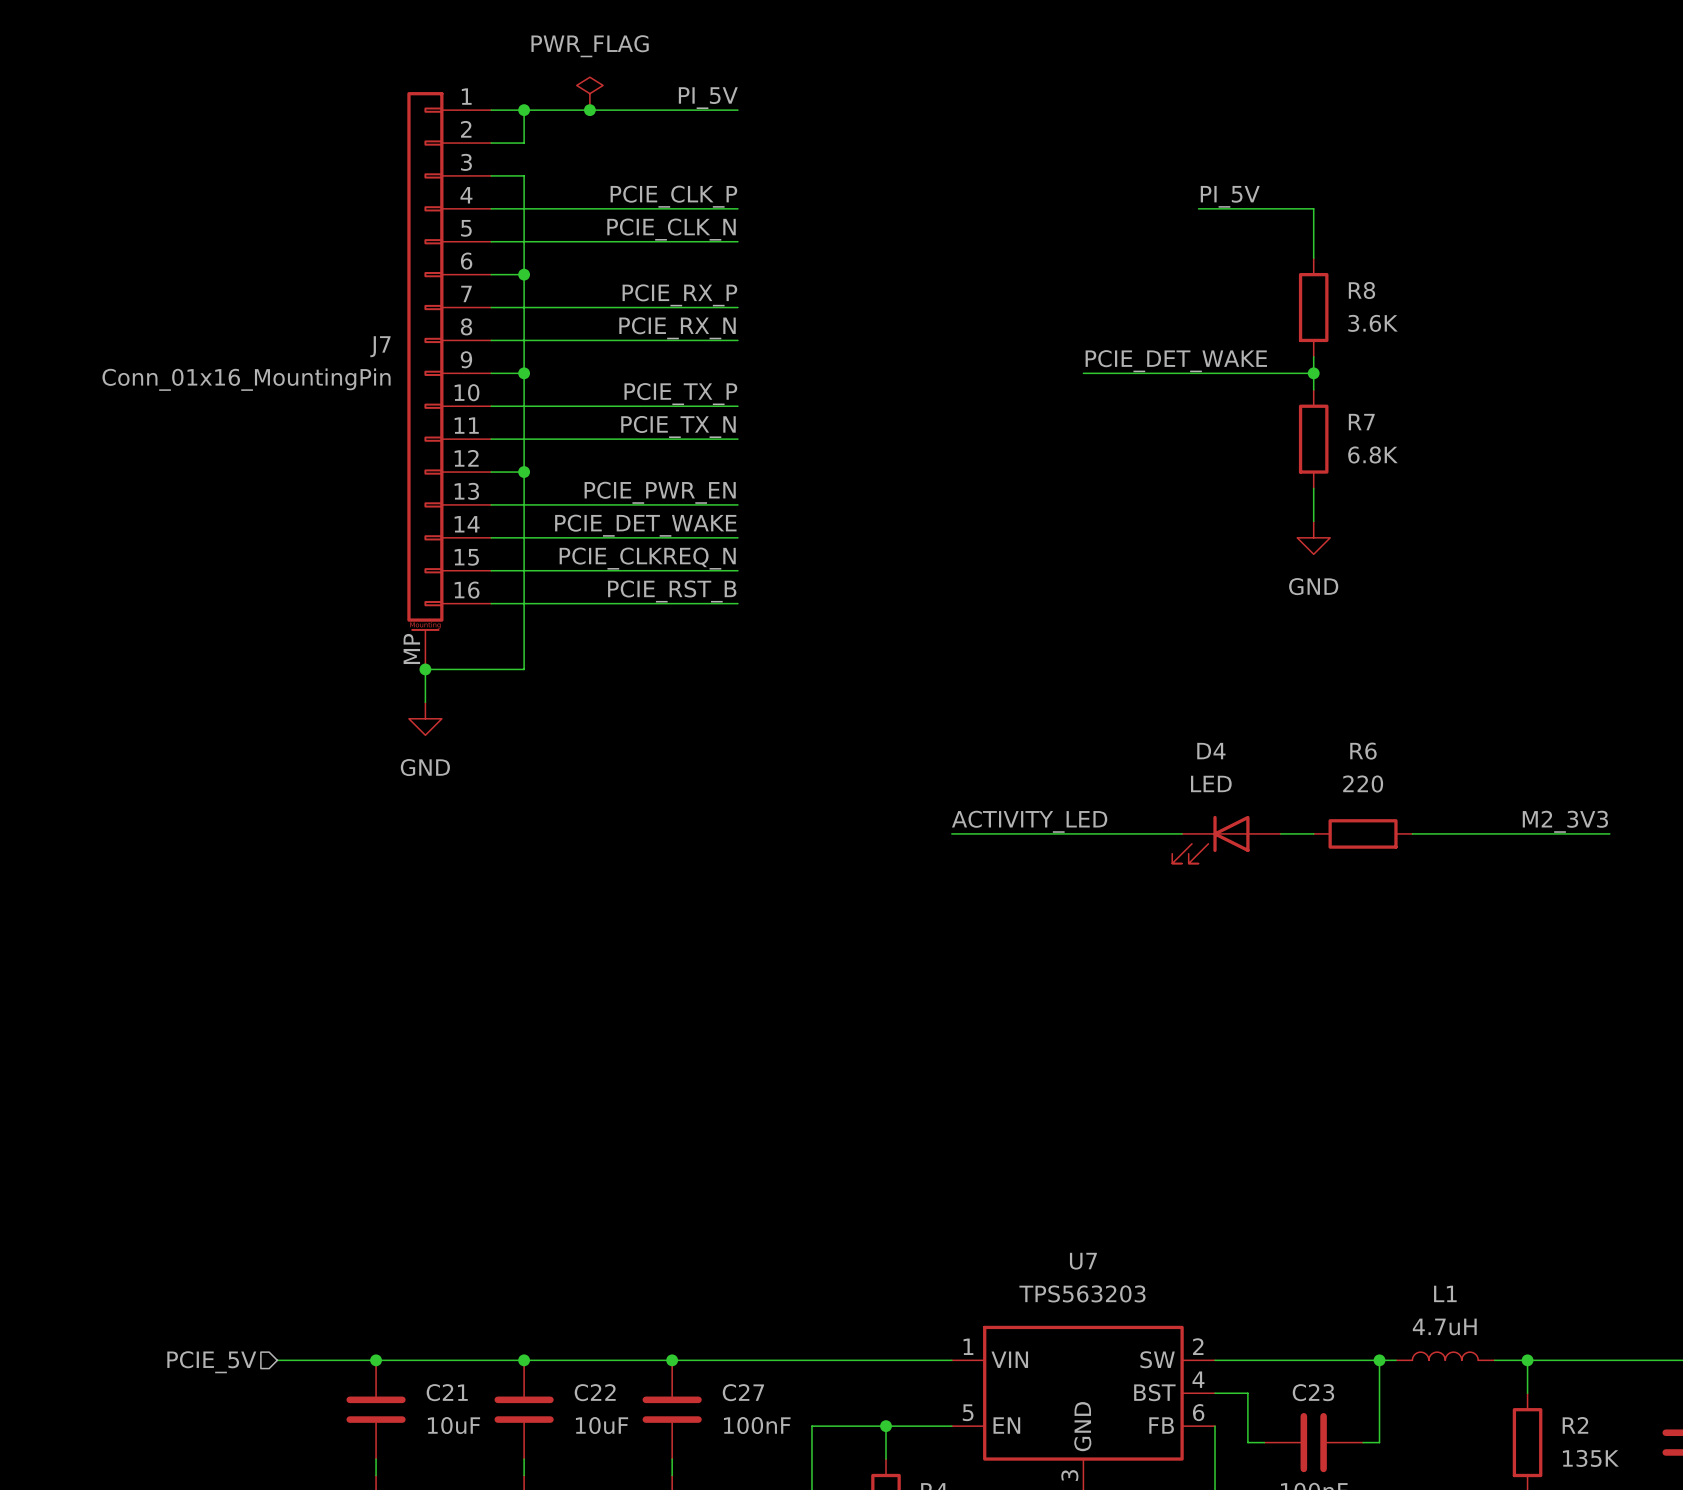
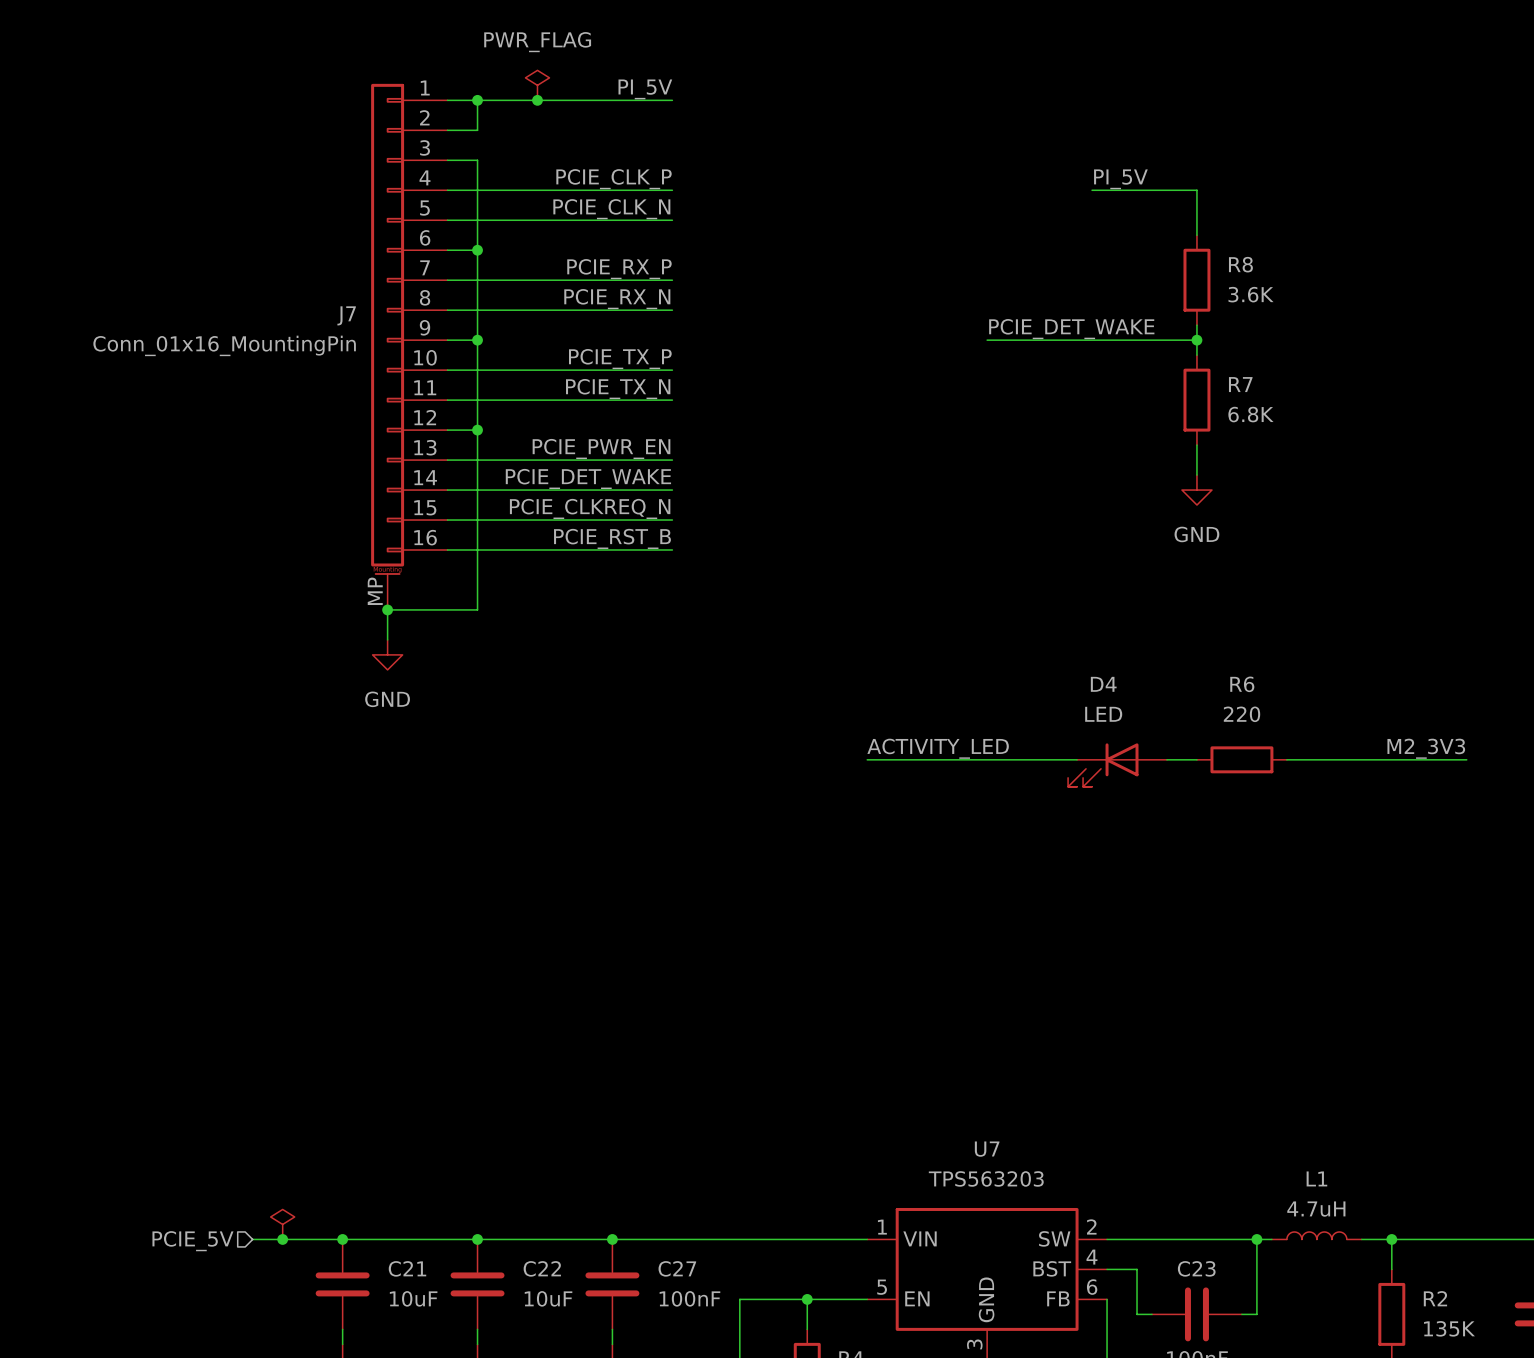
power symbol: none -> (282, 1224)
junction: none -> (282, 1239)

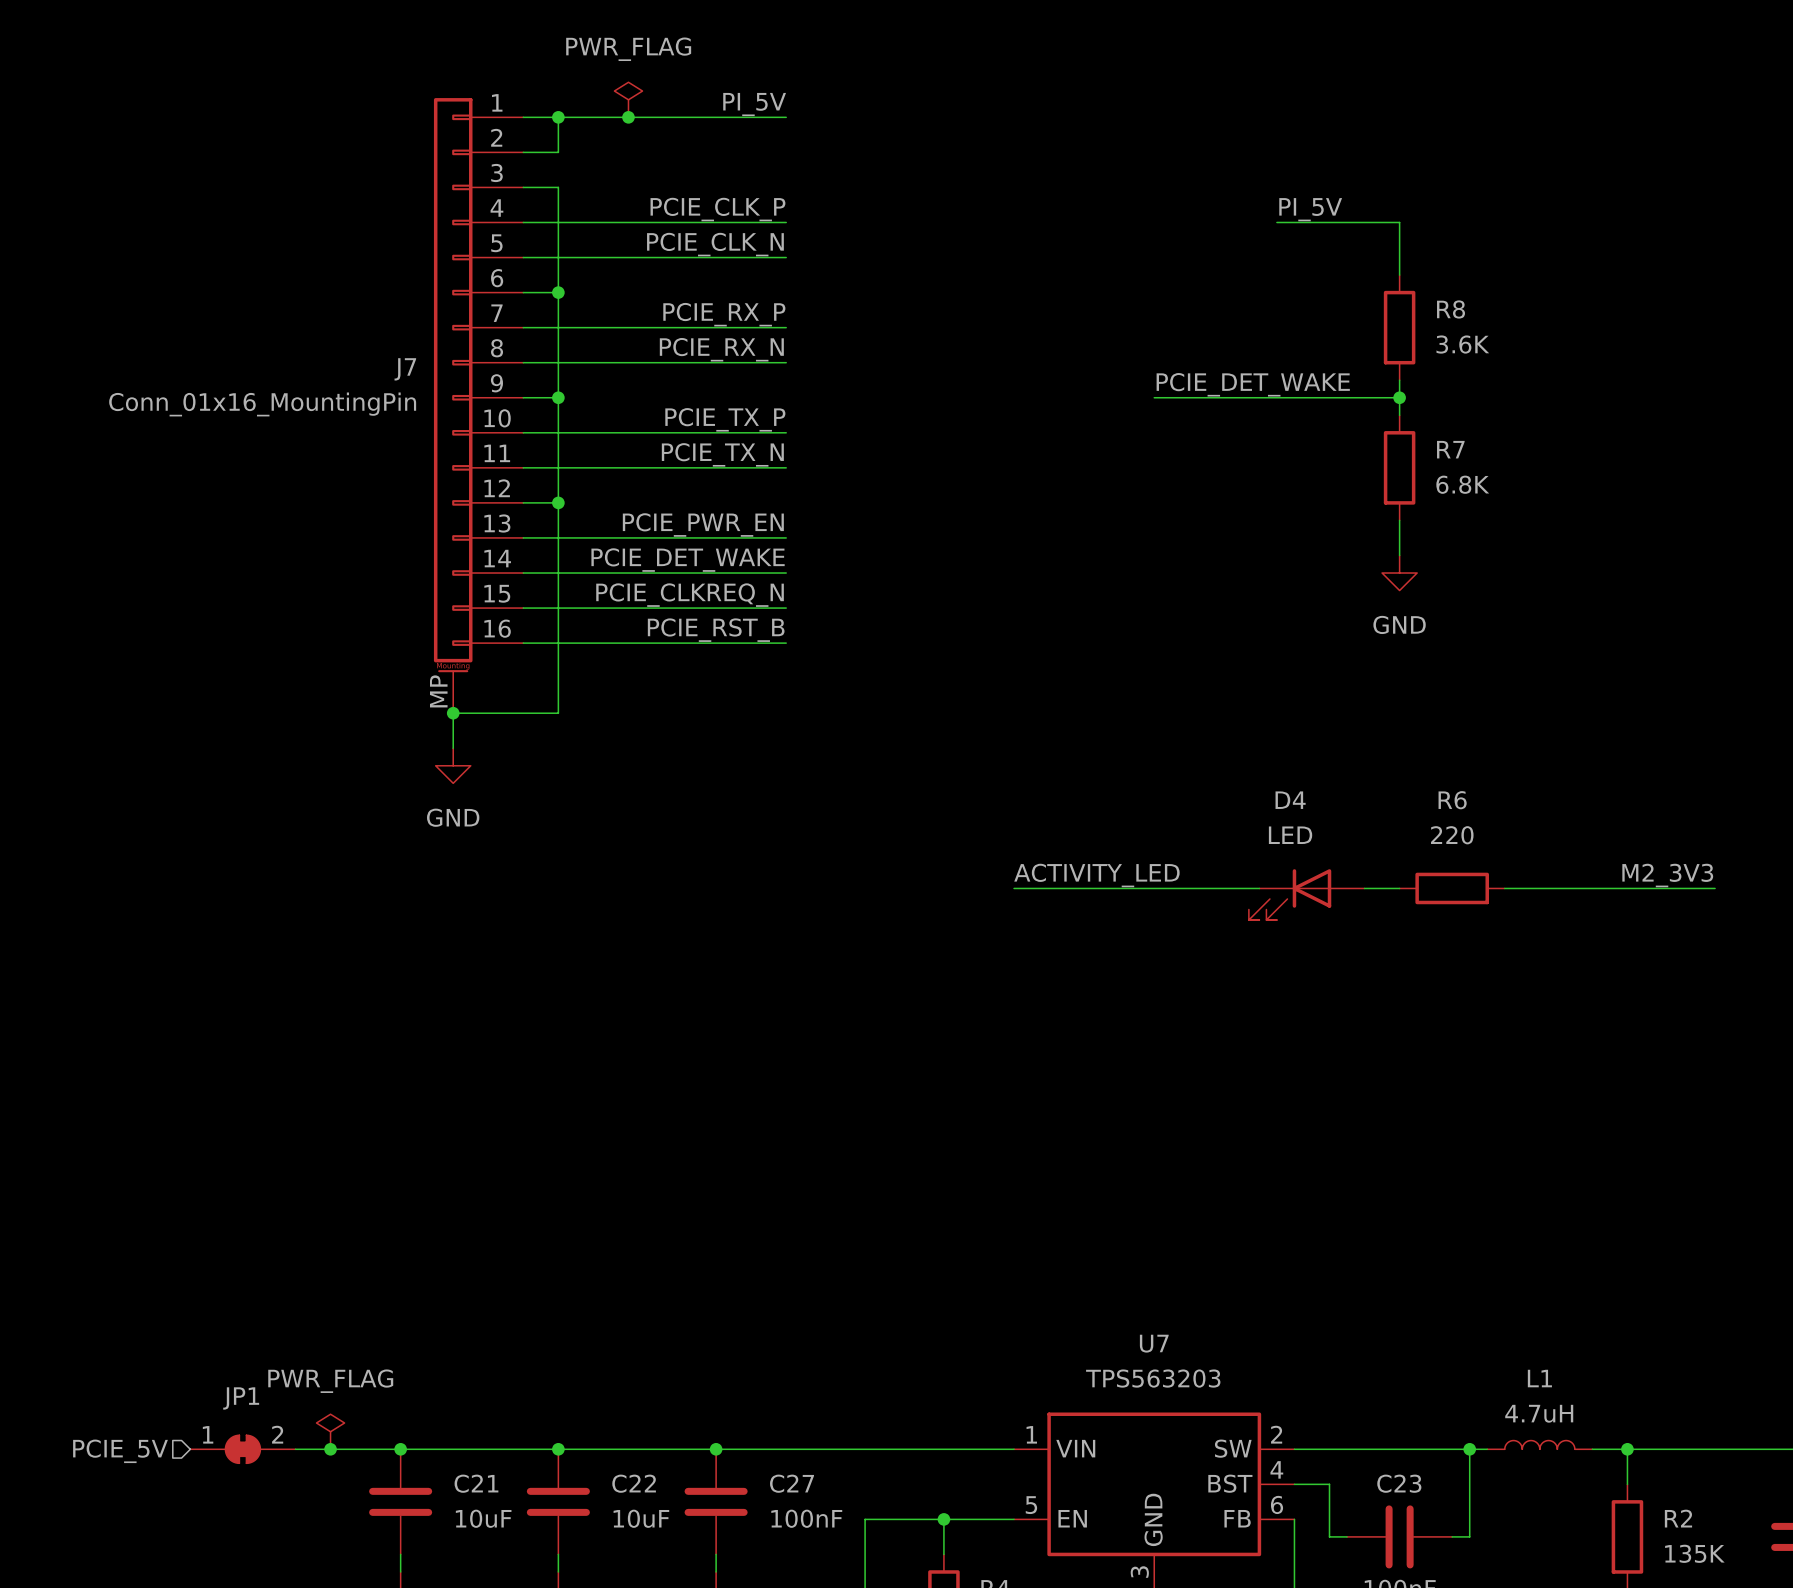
power symbol text: none -> PWR_FLAG (330, 1381)
JP1: none -> (242, 1449)
hierarchical label position: PCIE_5V (192, 1241) -> PCIE_5V (120, 1451)

